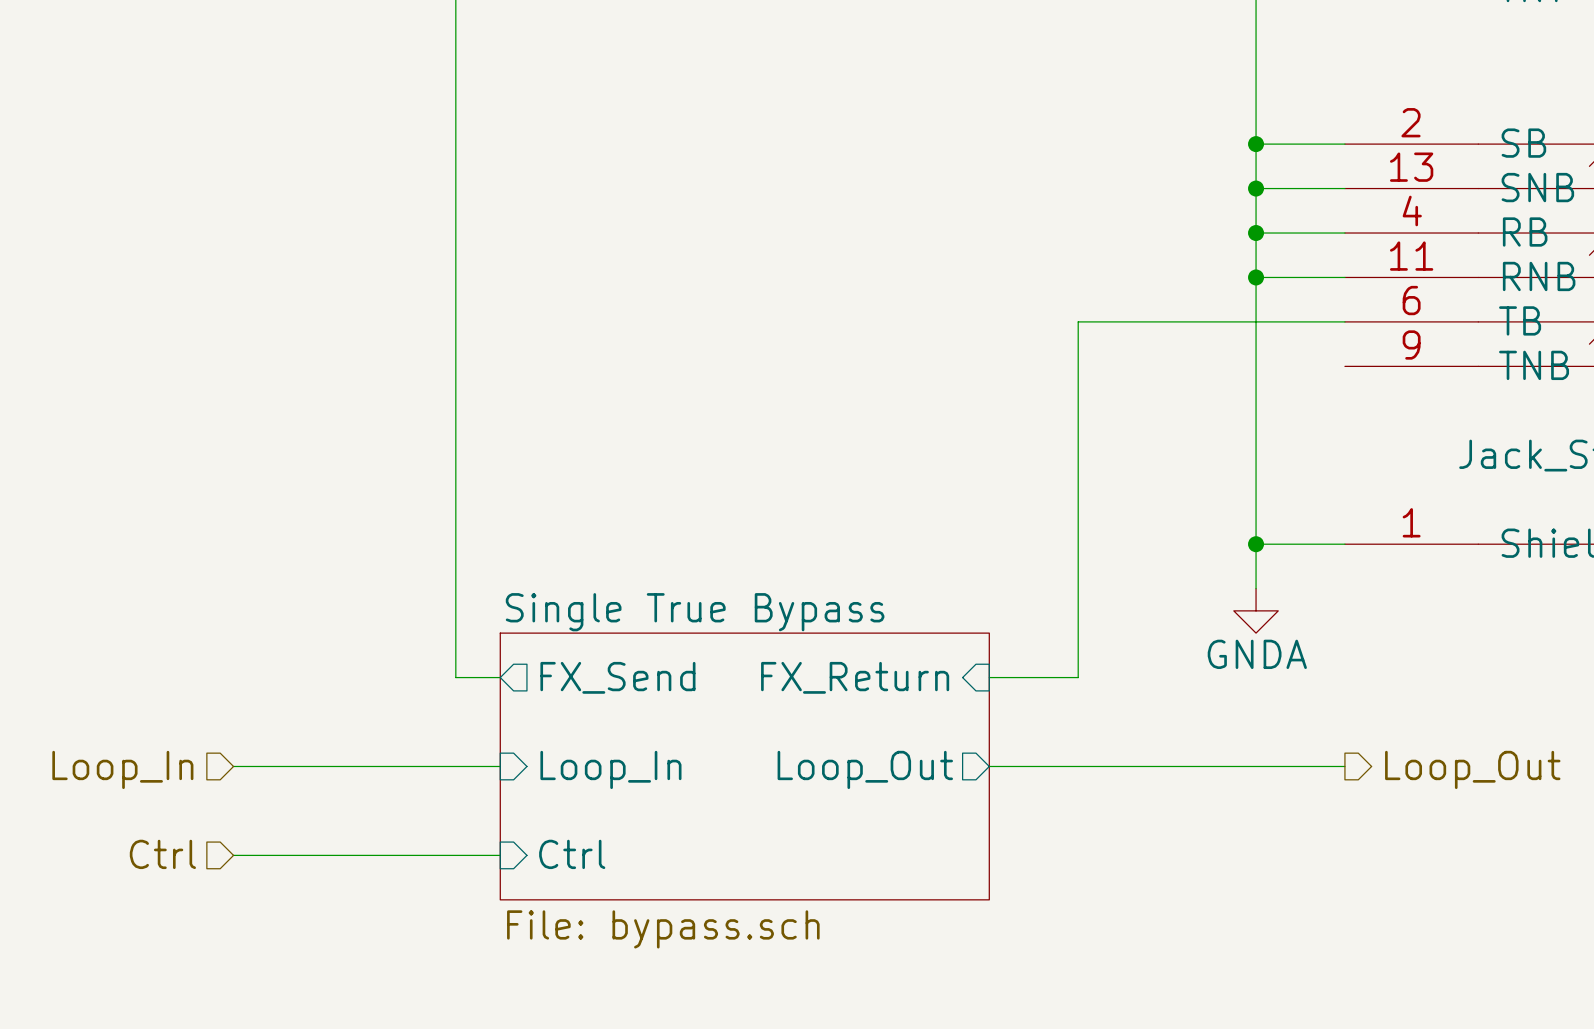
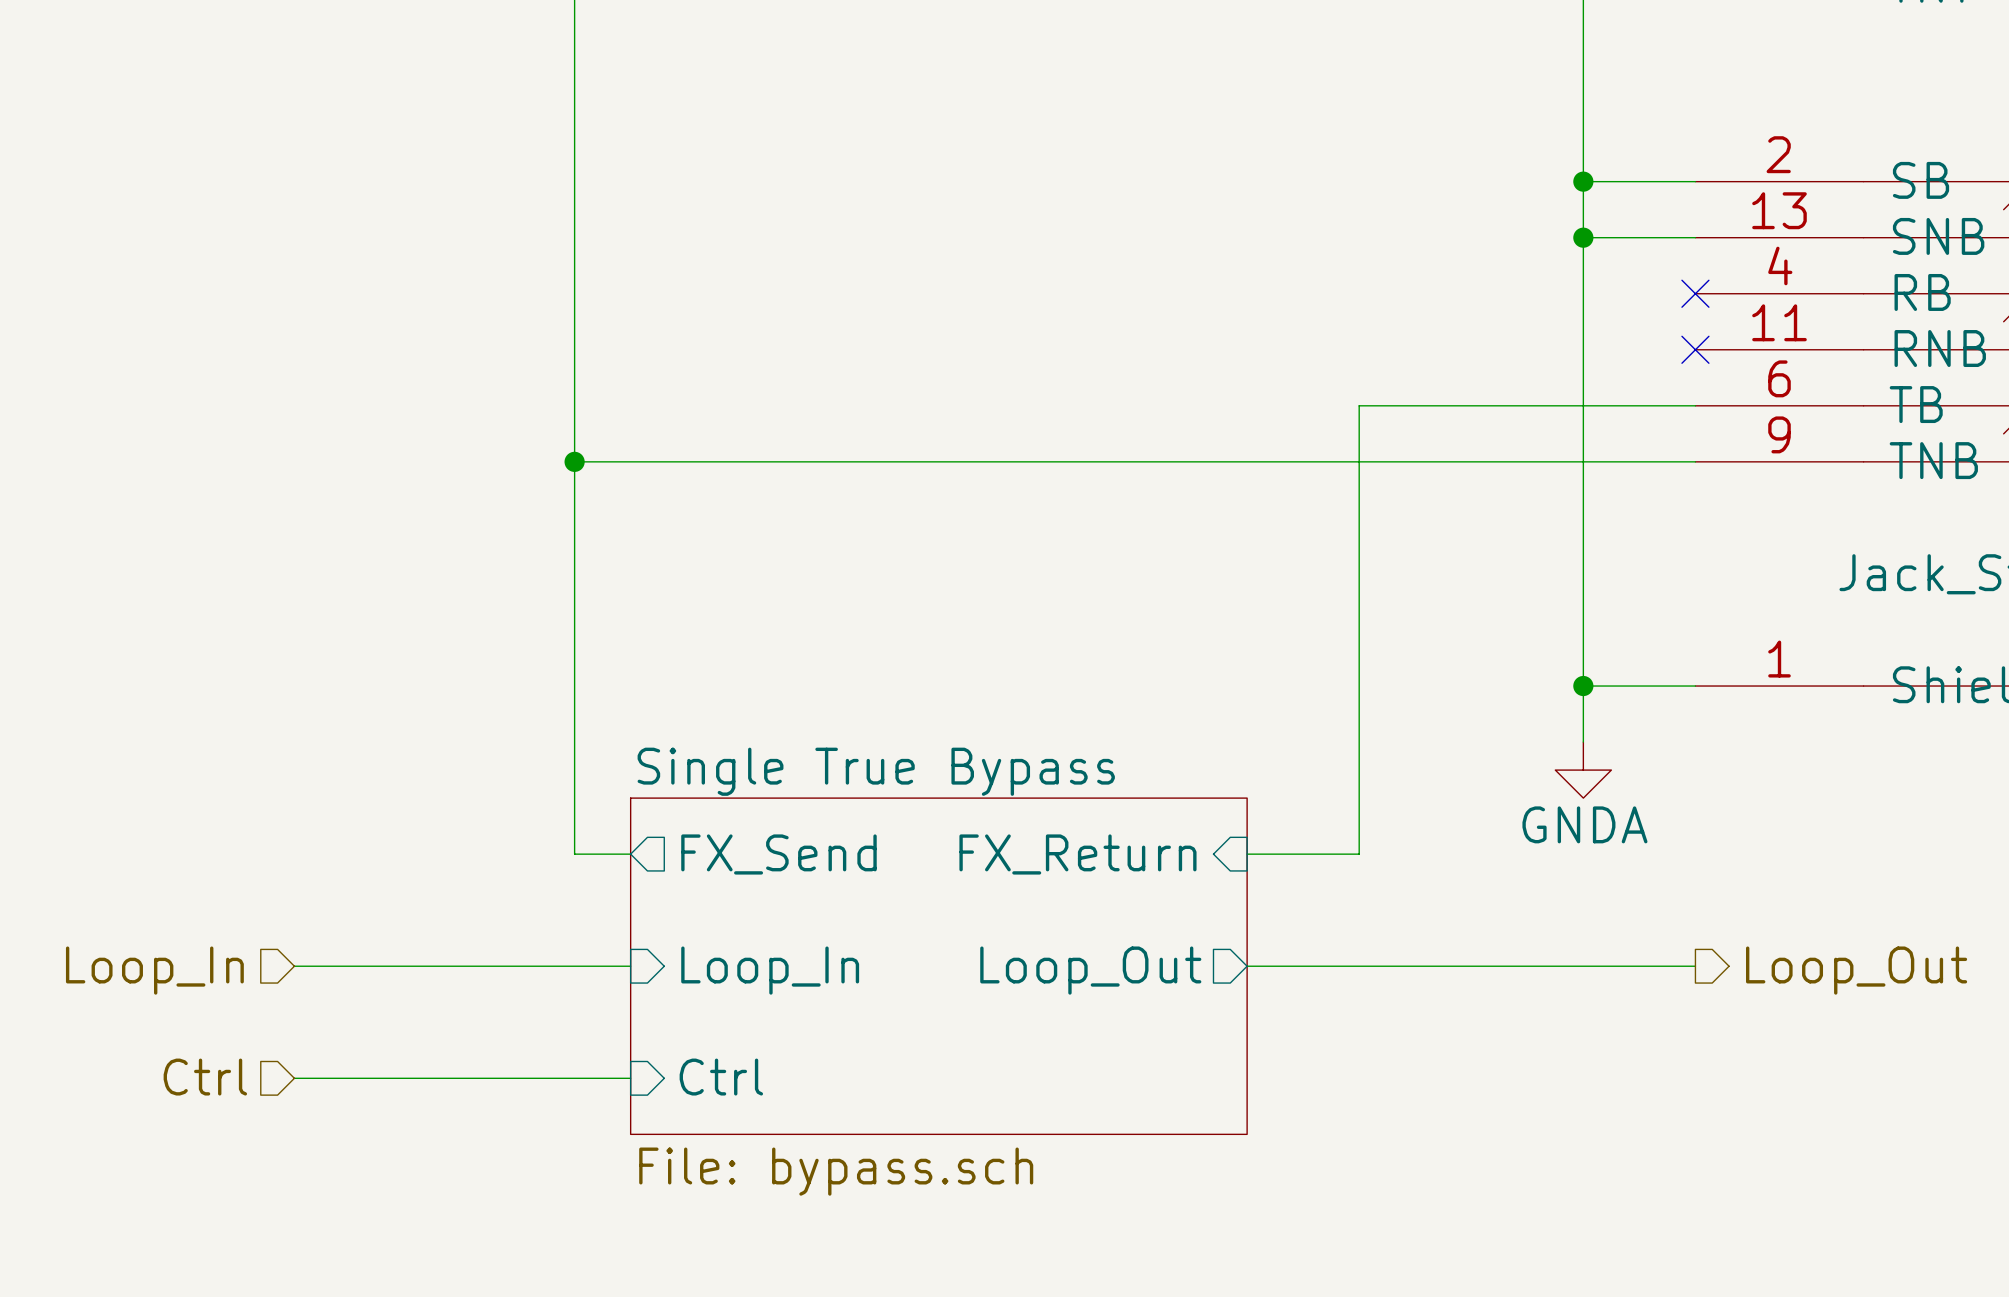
wire: (1256, 233) (1344, 233) -> none
junction: (1256, 233) -> none
no-connect mark: none -> (1695, 293)
wire: (1256, 277) (1344, 277) -> none
junction: (1256, 277) -> none
no-connect mark: none -> (1695, 349)
wire: none -> (574, 461) (1695, 461)
junction: none -> (574, 461)

